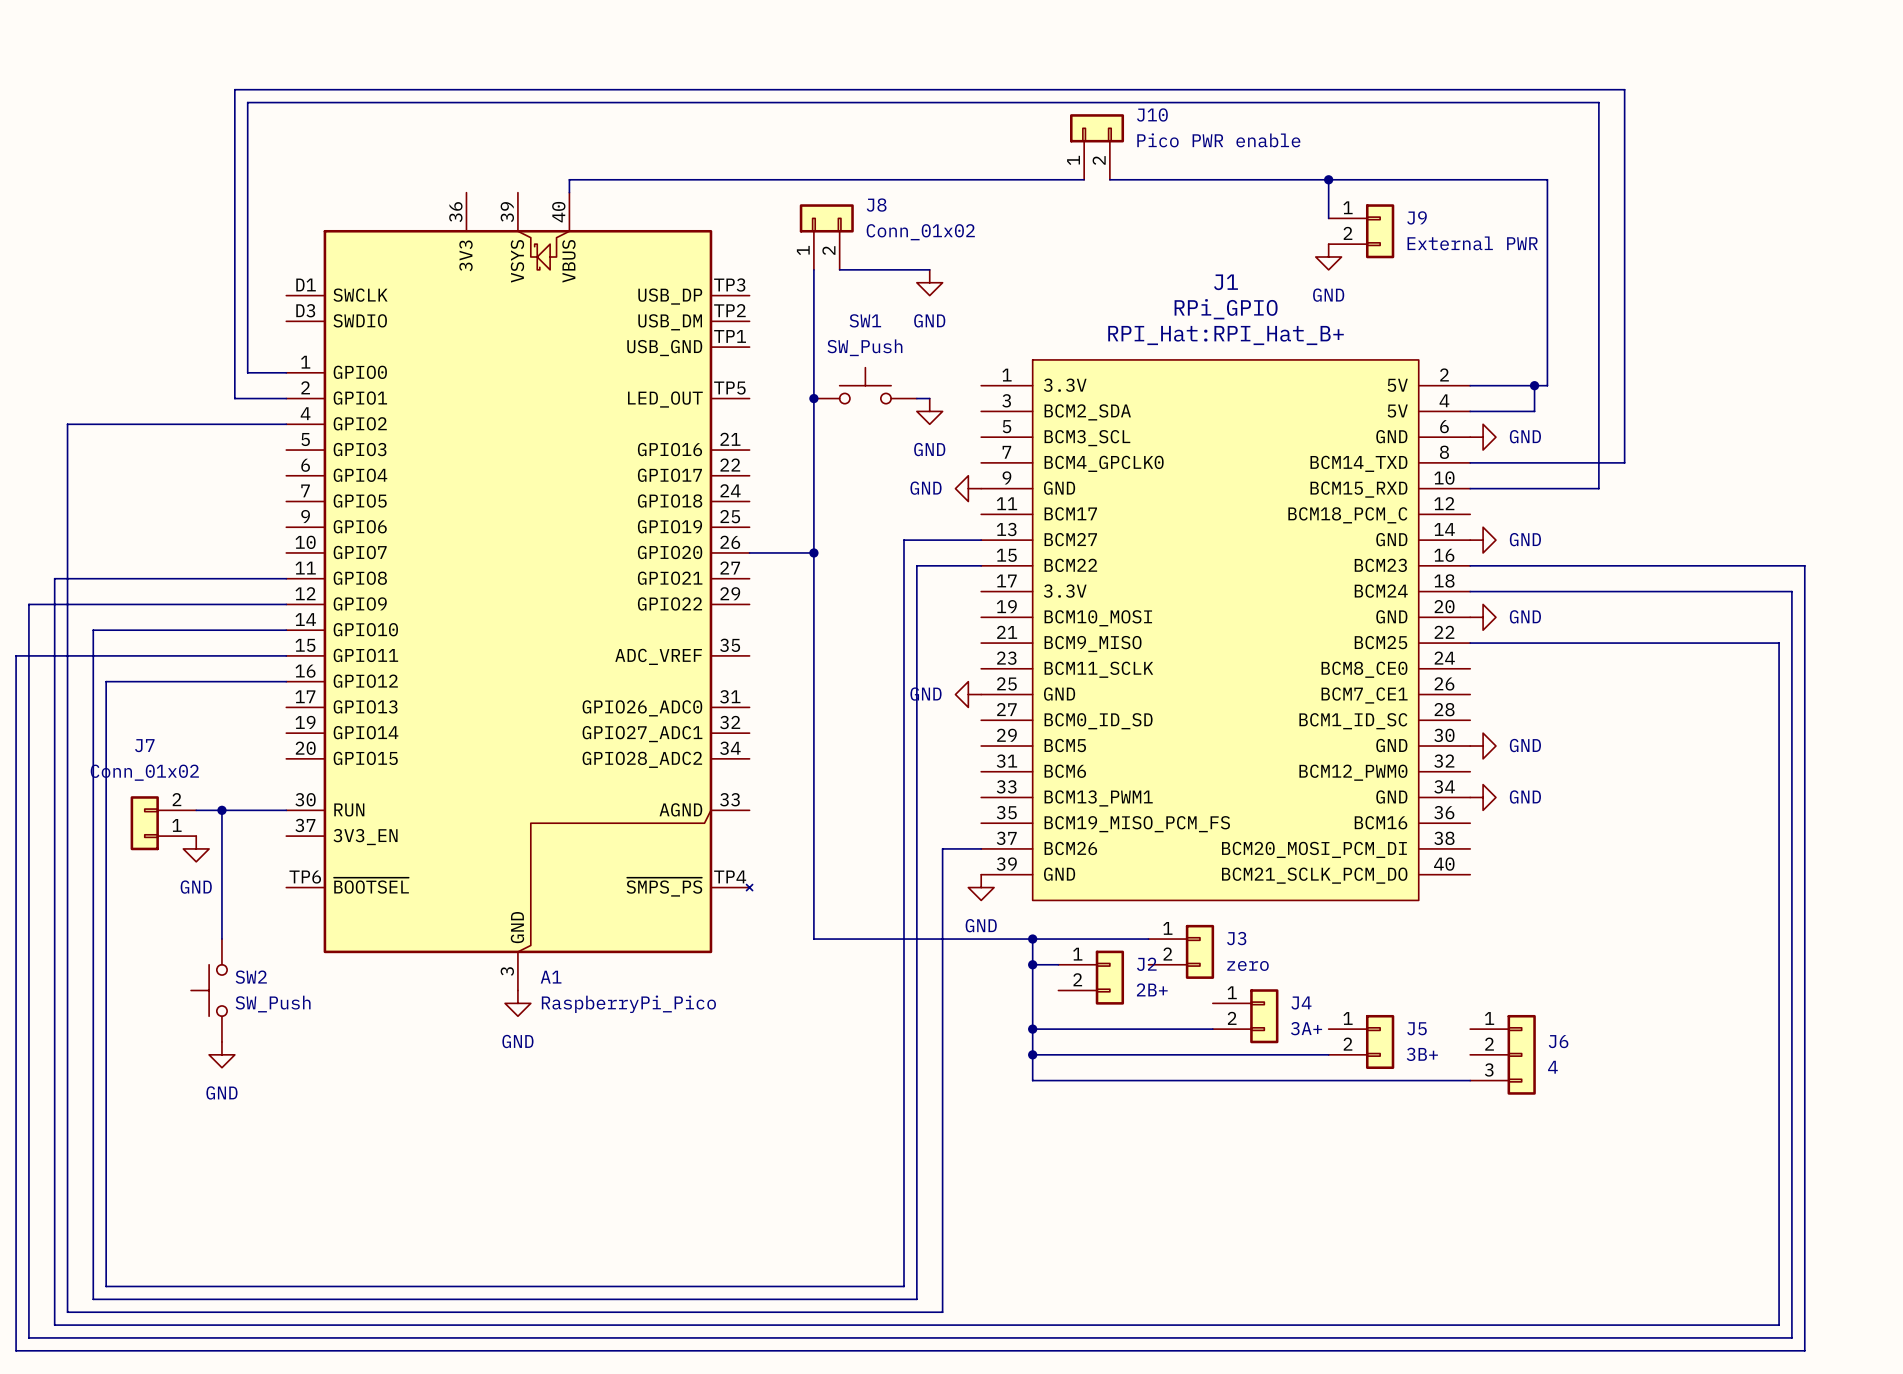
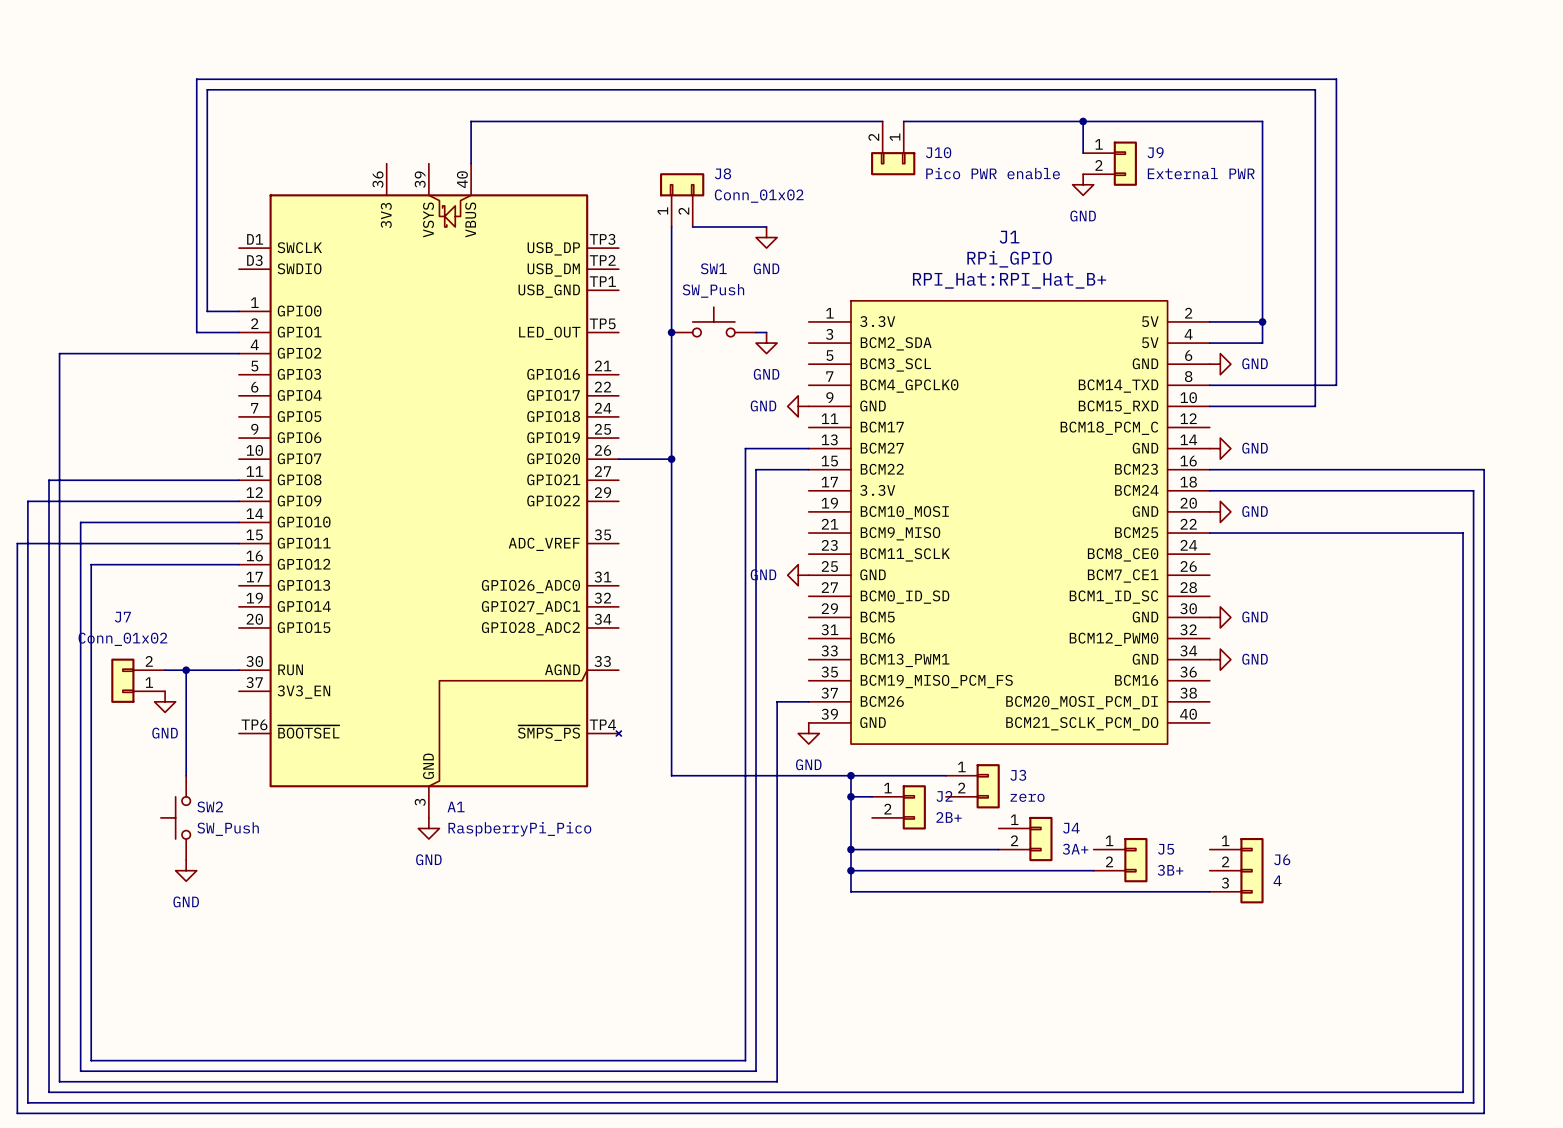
J10 name position: J10 (1152, 114) -> J10 (938, 152)
J10 rotation: 0° (1097, 128) -> 180° (893, 163)
J10 value position: Pico PWR enable (1218, 140) -> Pico PWR enable (993, 173)
wire: (569, 179) (1084, 179) -> (471, 153) (471, 121) (882, 121)
wire: (1109, 179) (1547, 179) (1547, 385) (1534, 385) -> (903, 121) (1262, 121) (1262, 321)
wire: (1328, 179) (1328, 218) -> (1083, 121) (1083, 153)
junction position: (1328, 179) -> (1083, 121)
J9 position: (1361, 231) -> (1110, 163)
power symbol position: GND (1328, 257) -> GND (1083, 184)

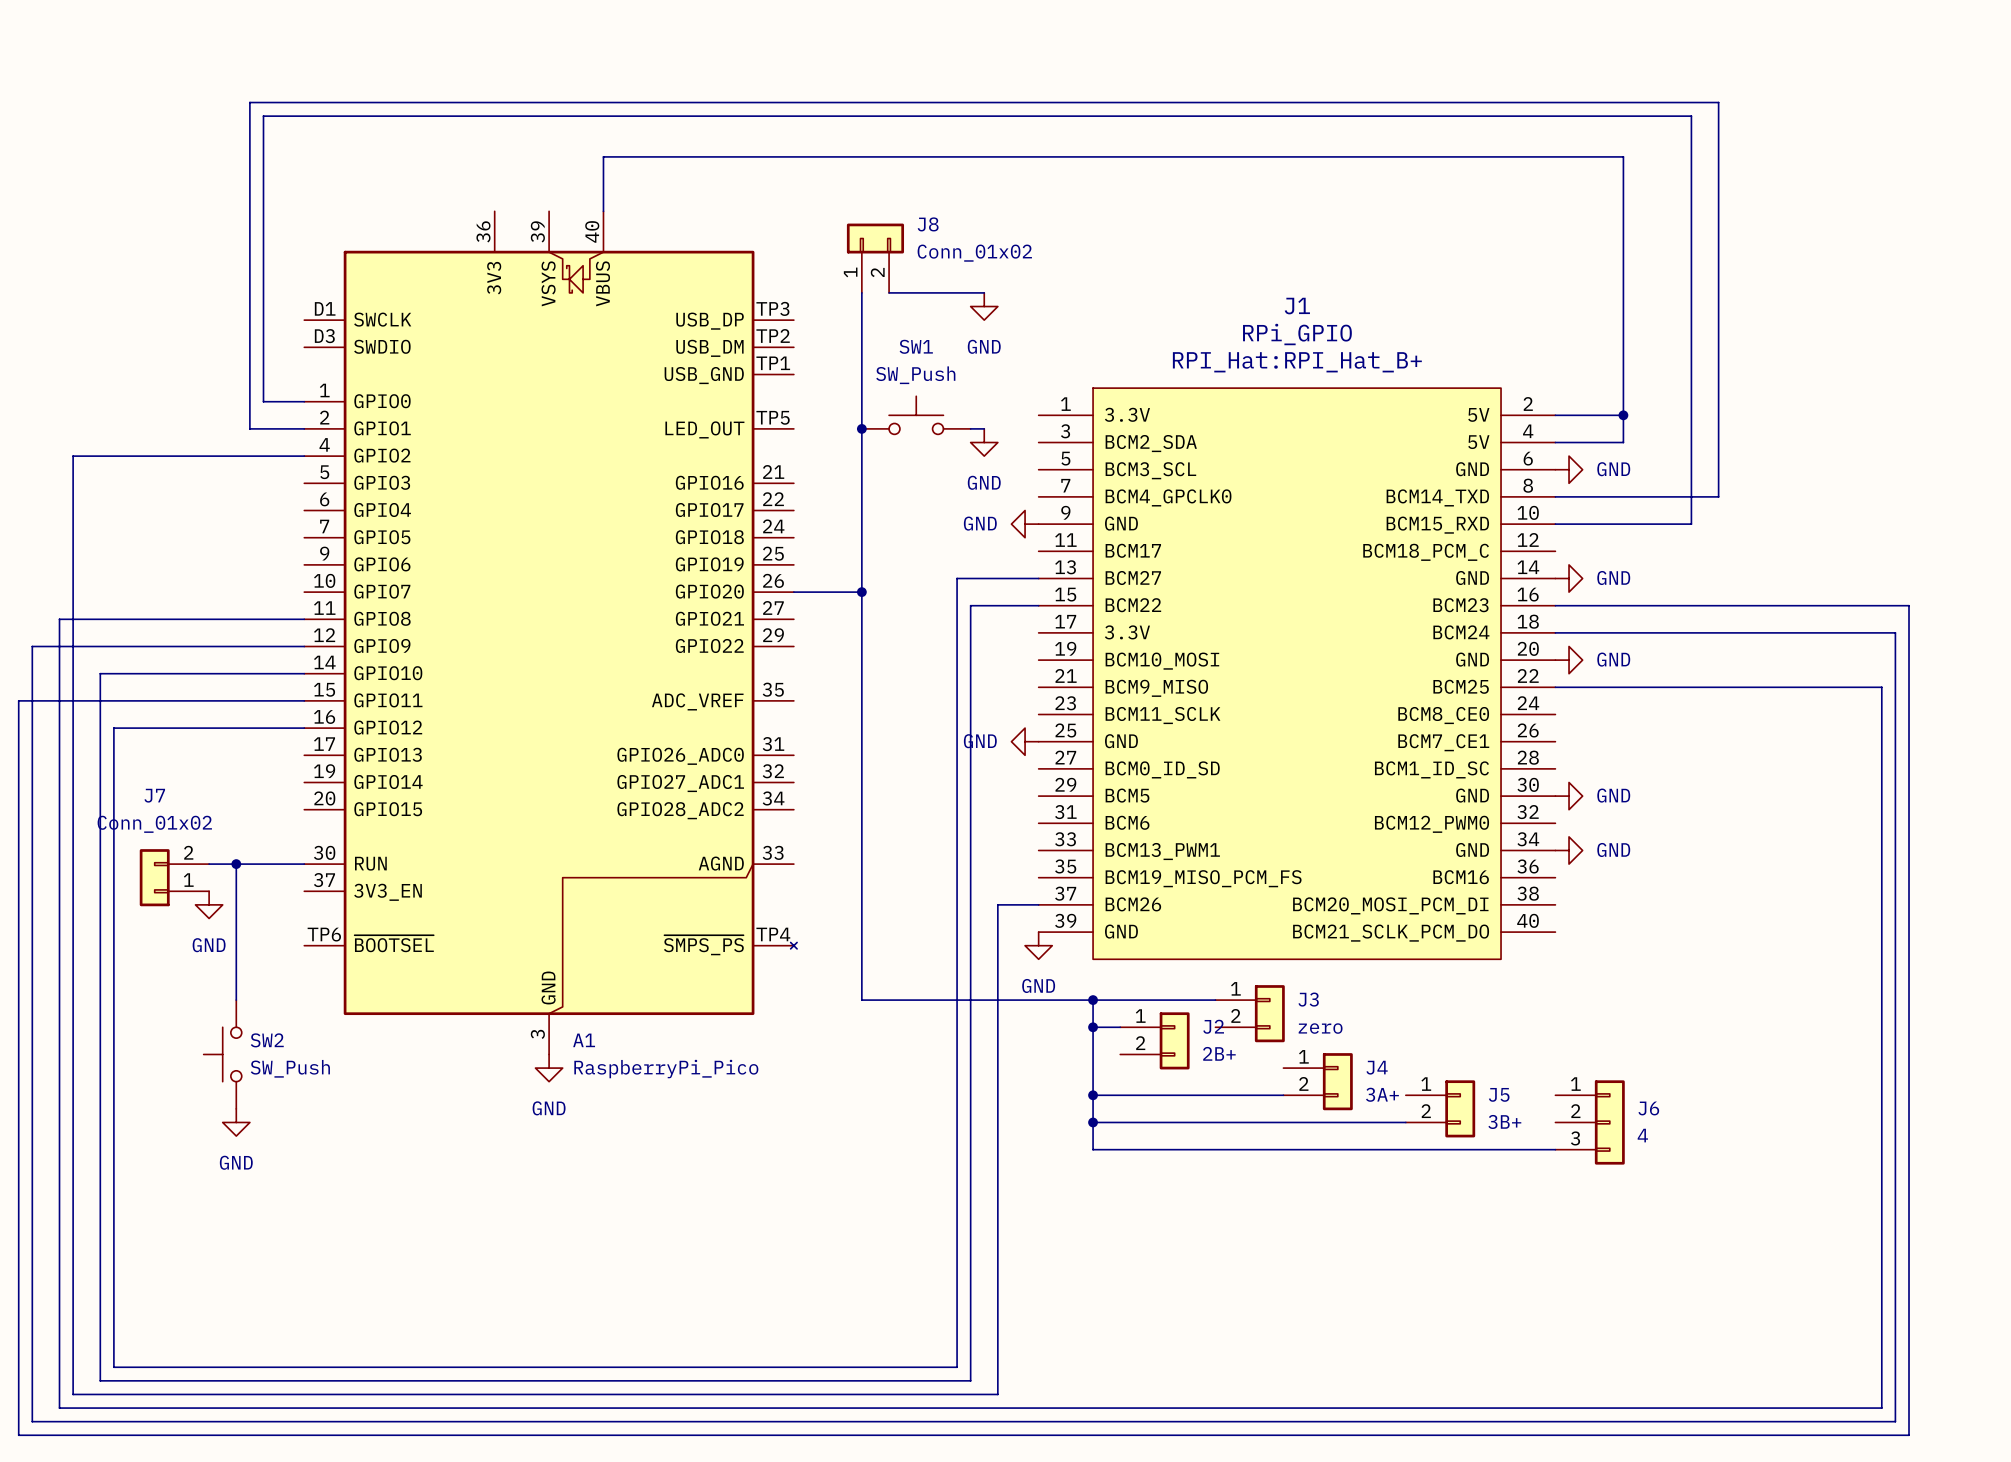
wire: none -> (1133, 156) (1161, 156)
wire: (1083, 121) (1083, 153) -> none
junction: (1083, 121) -> none
J10: Pico PWR enable (893, 148) -> none
J9: External PWR (1110, 163) -> none
power symbol: GND (1083, 184) -> none

